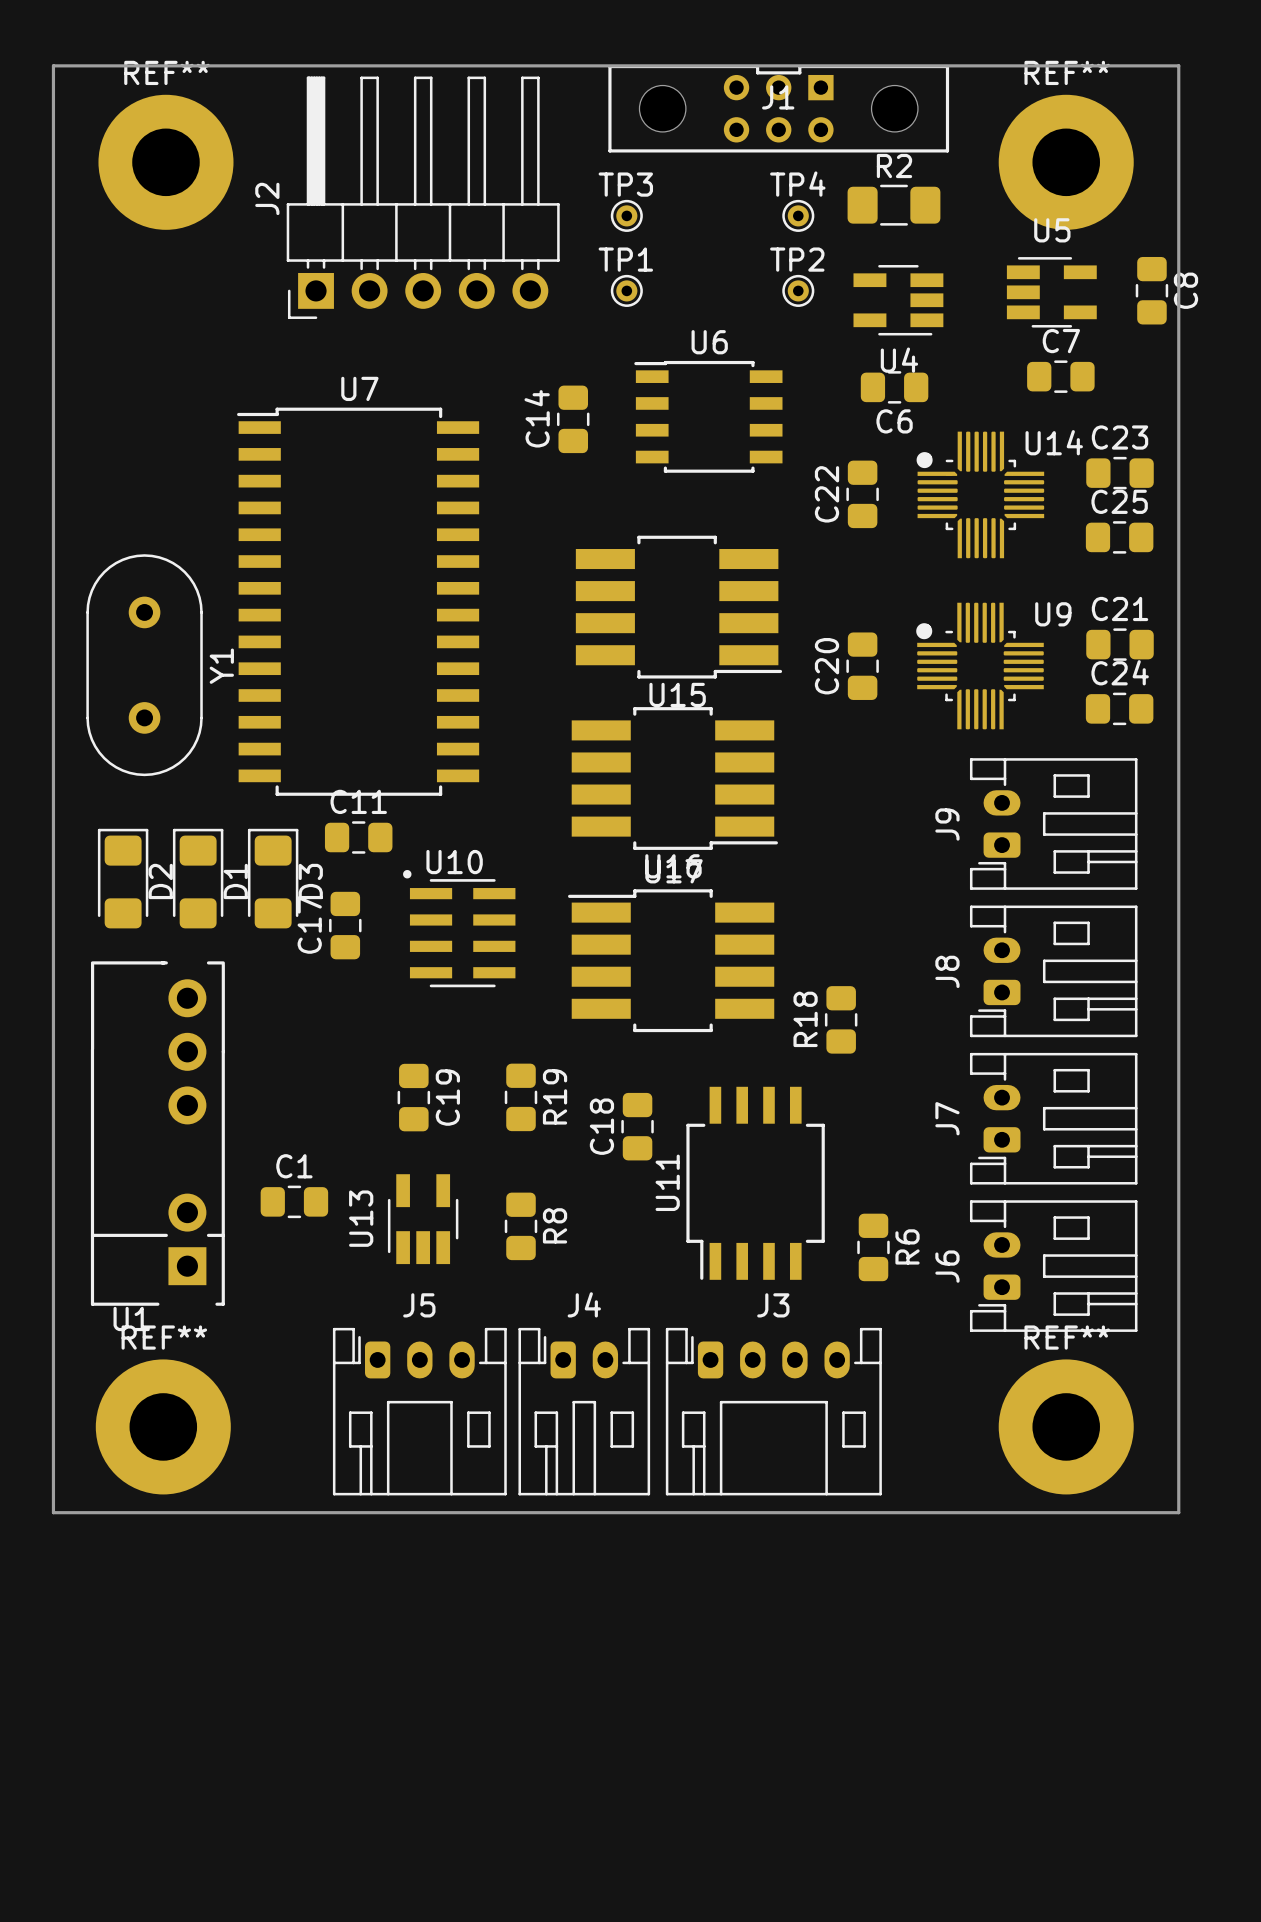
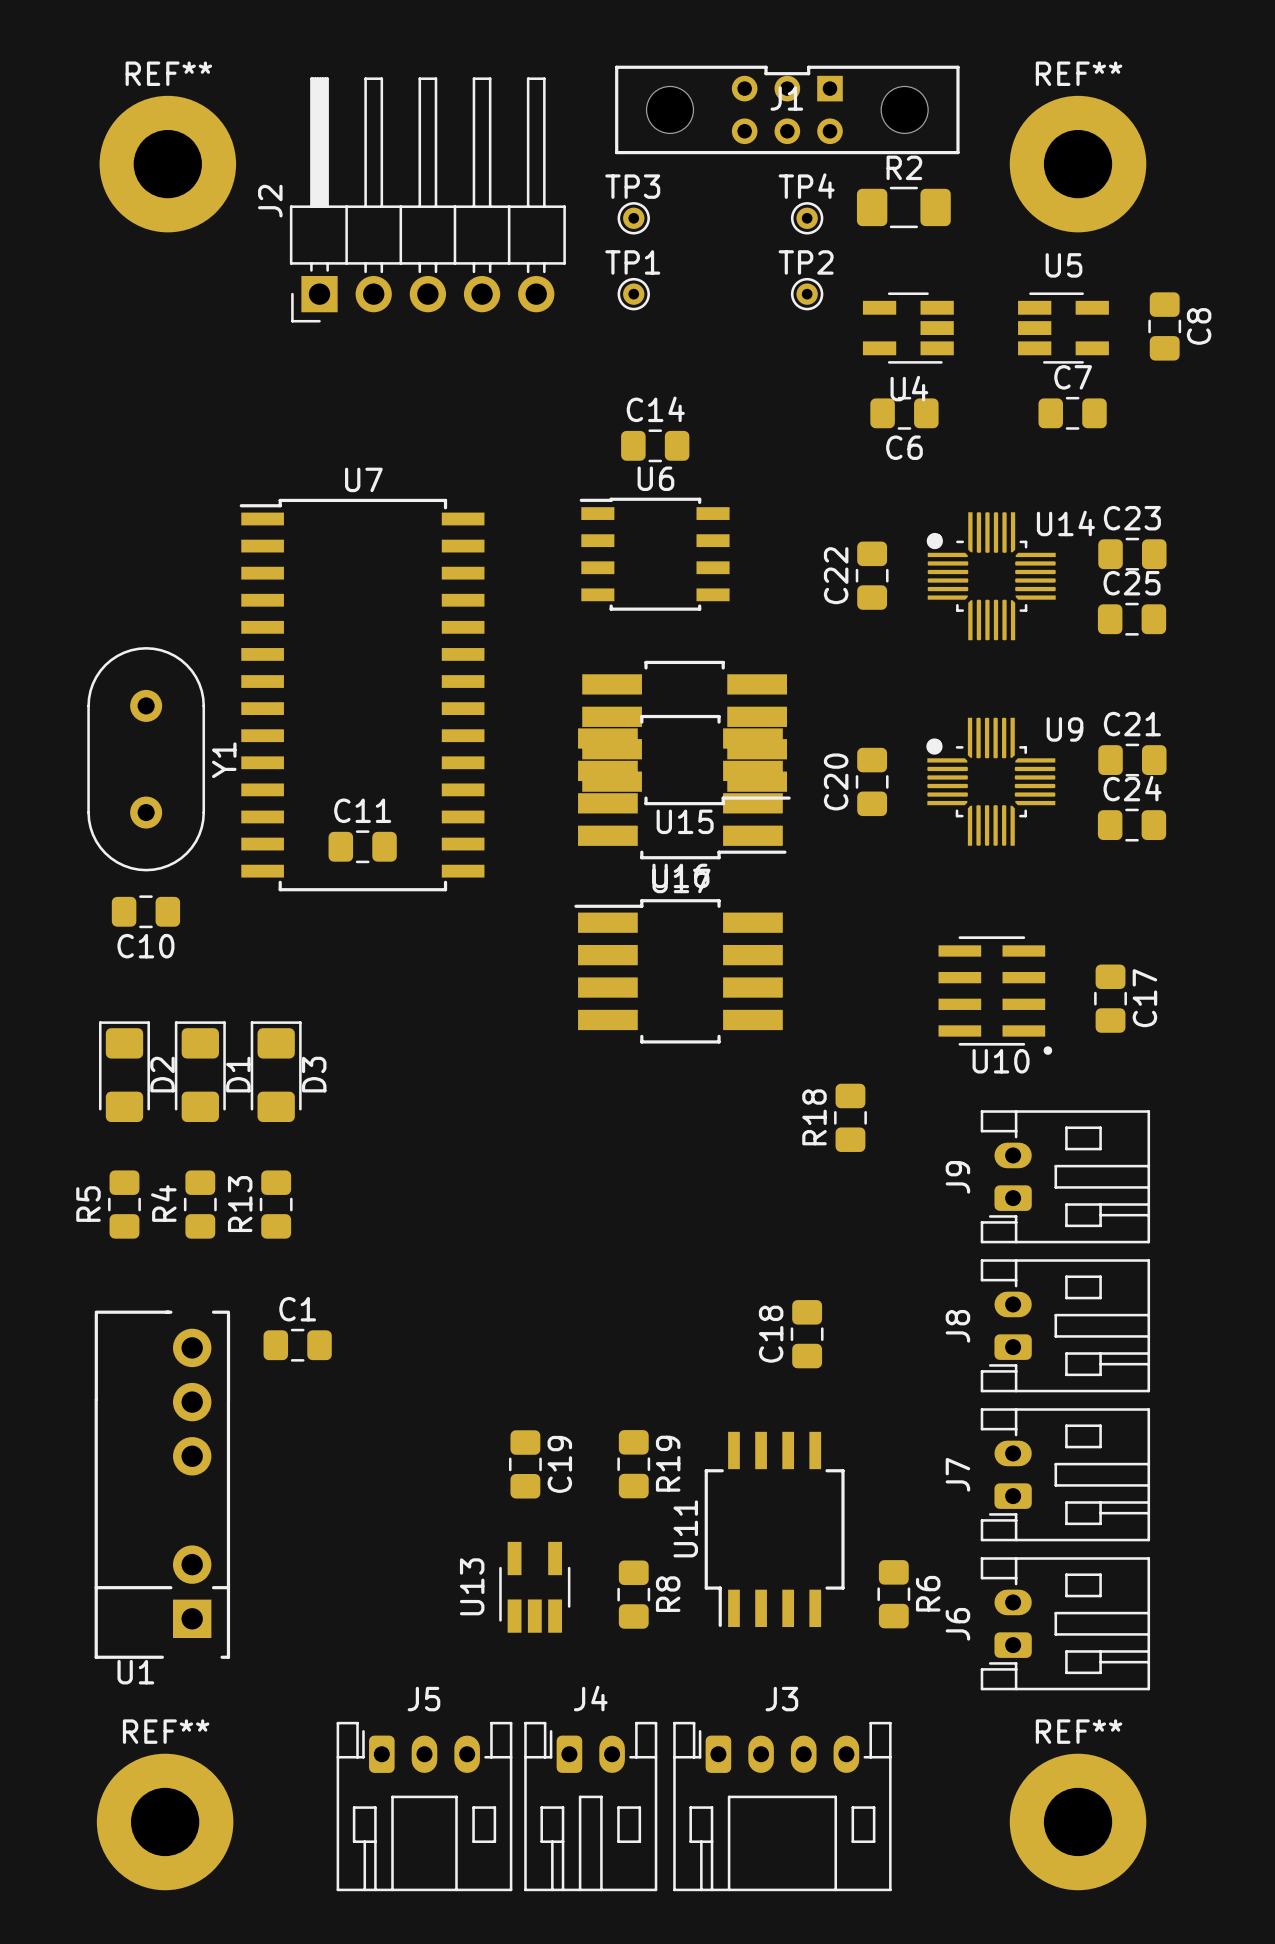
board edge: (53, 65) (53, 1512) (1178, 1512) (1178, 65) (53, 65) -> none
C8 position: (1151, 290) -> (1164, 326)
U5 position: (1051, 292) -> (1063, 328)
U4 position: (898, 300) -> (908, 328)
C7 position: (1060, 376) -> (1072, 413)
C6 position: (894, 387) -> (904, 413)
U6 position: (708, 416) -> (654, 554)
C14 rotation: 0° (573, 419) -> 90° clockwise (655, 445)
C14 position: (573, 419) -> (655, 445)
C23 position: (1120, 473) -> (1132, 554)
C22 position: (862, 494) -> (872, 575)
U14 position: (980, 494) -> (991, 576)
C25 position: (1119, 537) -> (1132, 619)
U7 position: (358, 601) -> (362, 695)
U15 position: (678, 607) -> (686, 733)
C21 position: (1120, 644) -> (1132, 760)
Y1 position: (144, 665) -> (146, 759)
C20 position: (862, 666) -> (872, 781)
U9 position: (980, 666) -> (990, 781)
C24 position: (1119, 708) -> (1132, 825)
J9 position: (1053, 824) -> (1065, 1176)
D2 position: (123, 878) -> (124, 1071)
D1 position: (198, 878) -> (200, 1071)
D3 position: (273, 878) -> (276, 1071)
C10: none -> (145, 911)
C17 name position: C17 (309, 925) -> C17 (1144, 998)
C17 position: (345, 925) -> (1110, 998)
U10 rotation: 0° (459, 928) -> 180° (995, 995)
U10 position: (459, 928) -> (995, 995)
J8 position: (1053, 971) -> (1065, 1325)
R18 position: (841, 1019) -> (850, 1117)
C19 position: (413, 1097) -> (525, 1464)
R19 position: (521, 1097) -> (633, 1464)
J7 position: (1053, 1118) -> (1065, 1474)
C18 position: (637, 1126) -> (807, 1334)
U1 position: (157, 1133) -> (162, 1484)
U11 position: (755, 1183) -> (774, 1529)
R5: none -> (124, 1204)
R4: none -> (200, 1204)
R13: none -> (276, 1204)
C1 position: (294, 1201) -> (297, 1345)
U13 position: (423, 1219) -> (534, 1587)
R8 position: (521, 1226) -> (633, 1594)
R6 position: (873, 1247) -> (893, 1594)
J6 position: (1053, 1266) -> (1065, 1623)
J5 position: (419, 1411) -> (424, 1806)
J4 position: (584, 1411) -> (590, 1806)
J3 position: (773, 1411) -> (782, 1806)
REF** position: (163, 1426) -> (165, 1821)
REF** position: (1066, 1426) -> (1078, 1821)

